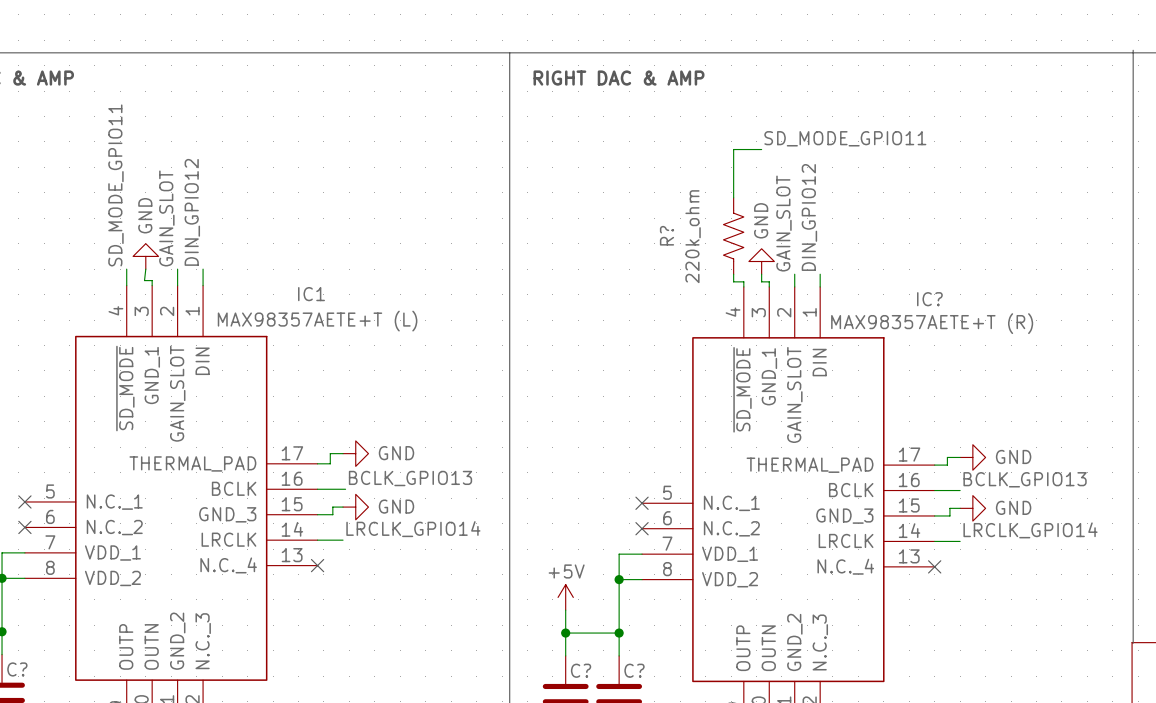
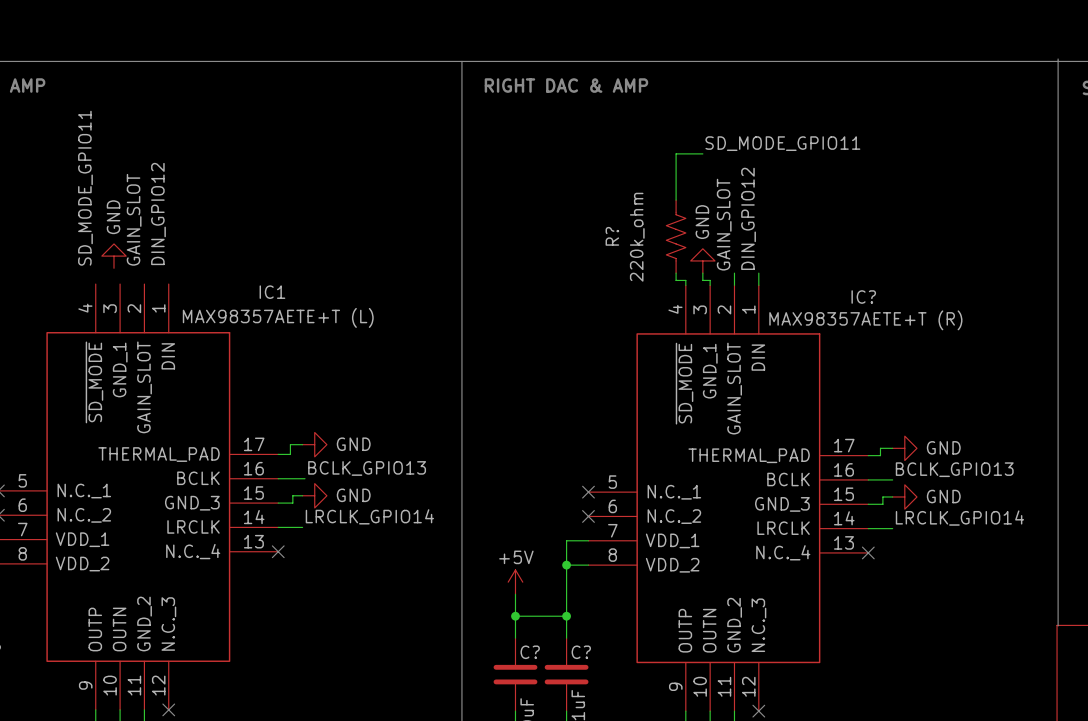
wire: (126, 269) (126, 285) -> none
wire: (145, 269) (144, 280) (152, 280) (152, 285) -> none
wire: (177, 269) (177, 285) -> none
wire: (203, 269) (203, 285) -> none

